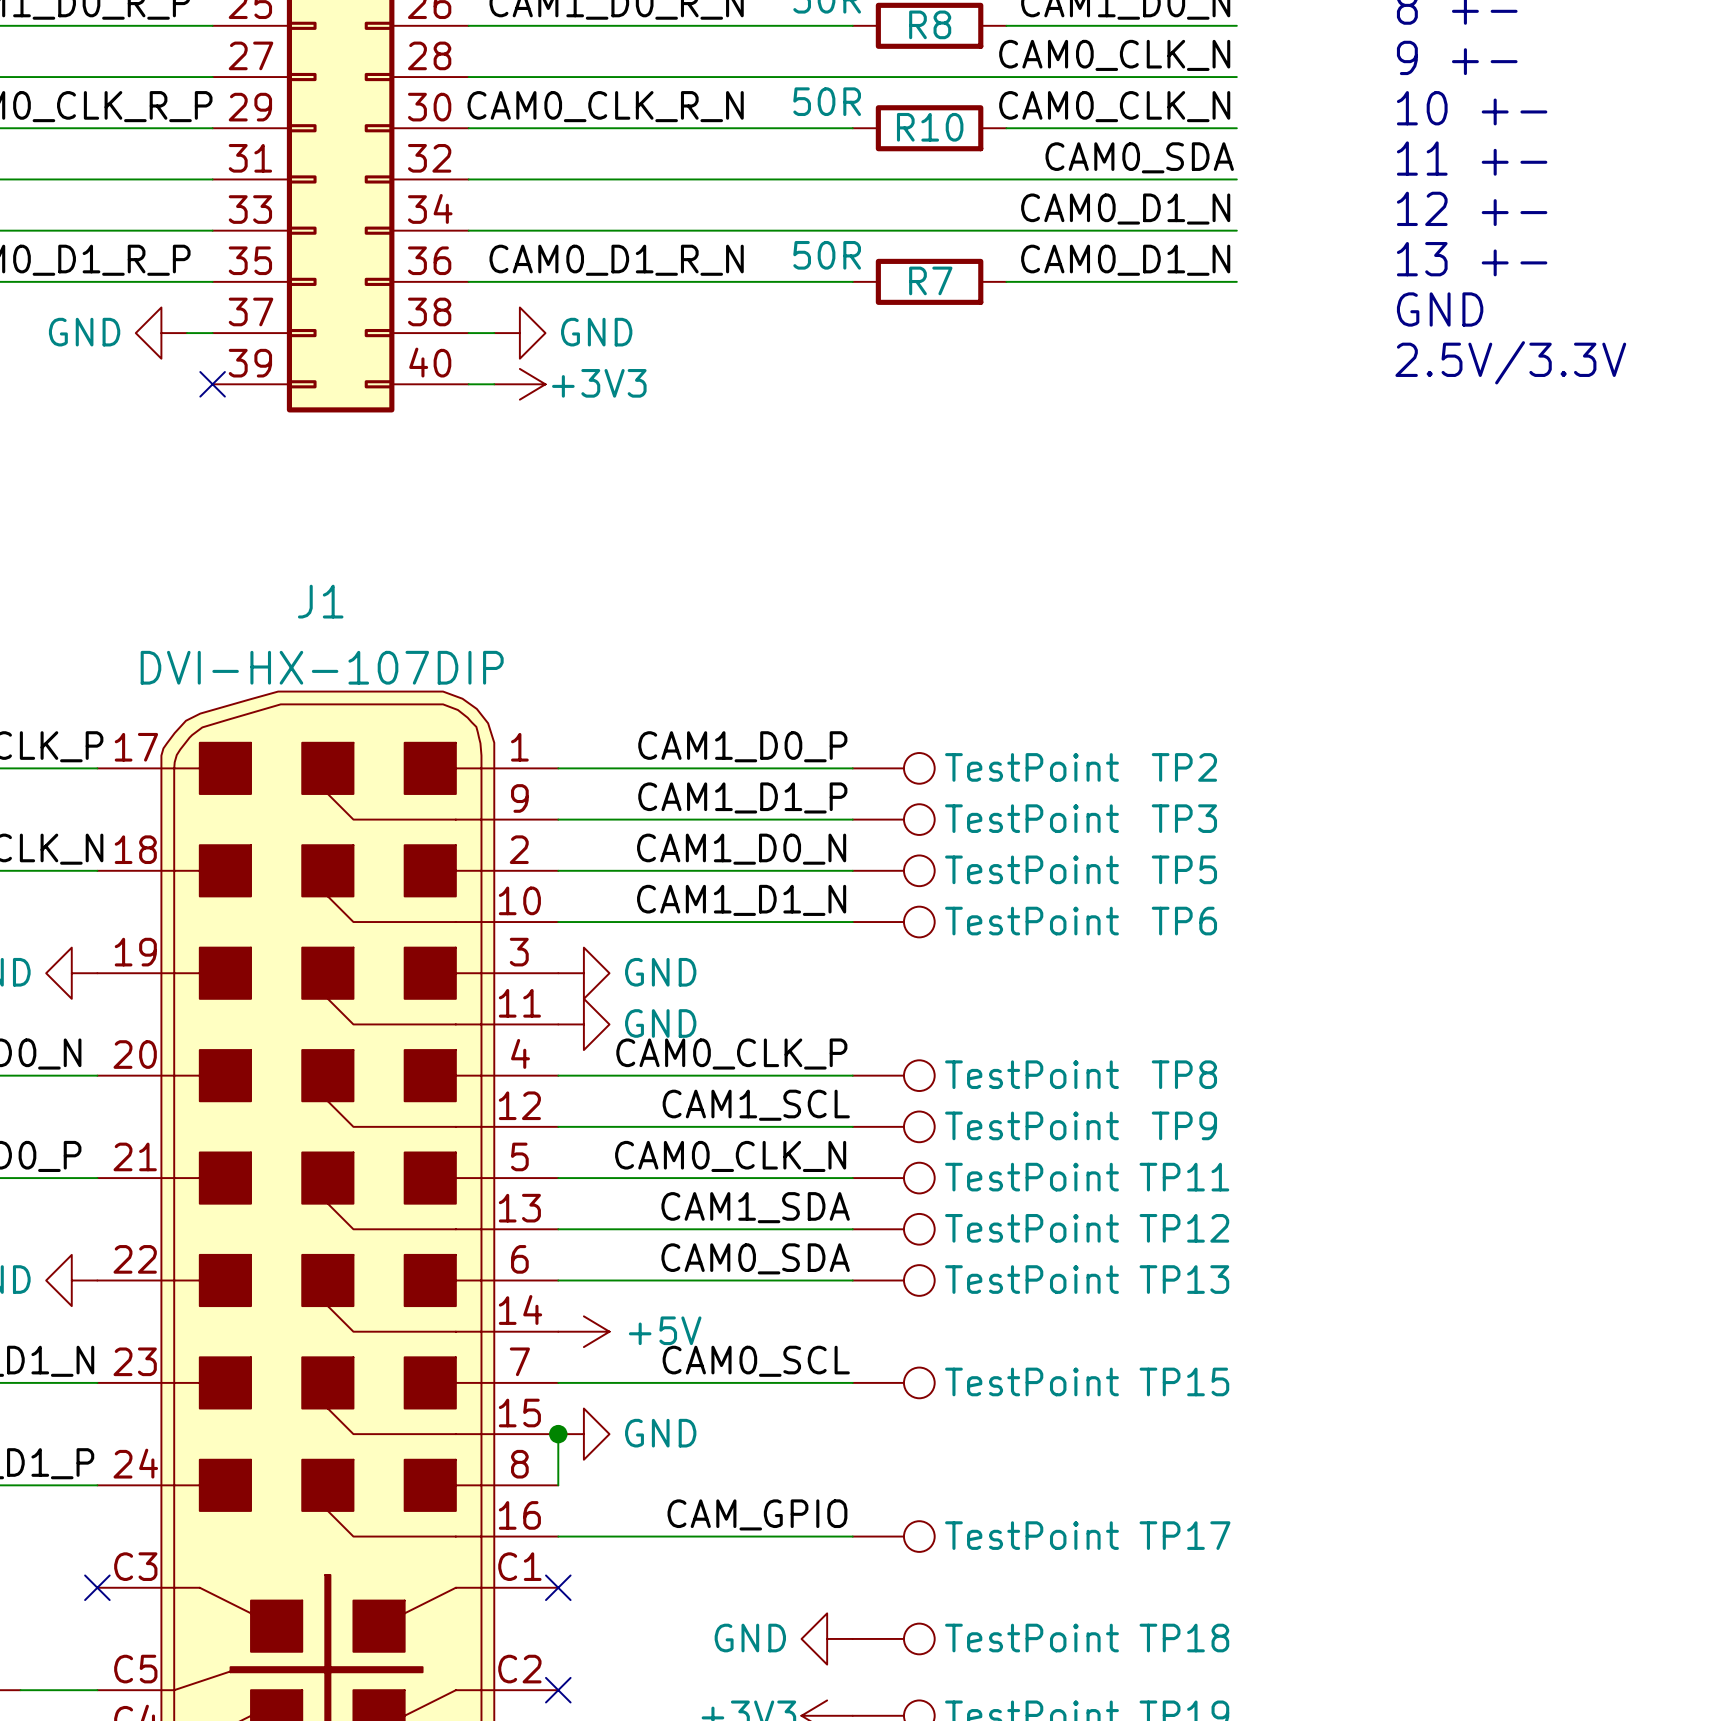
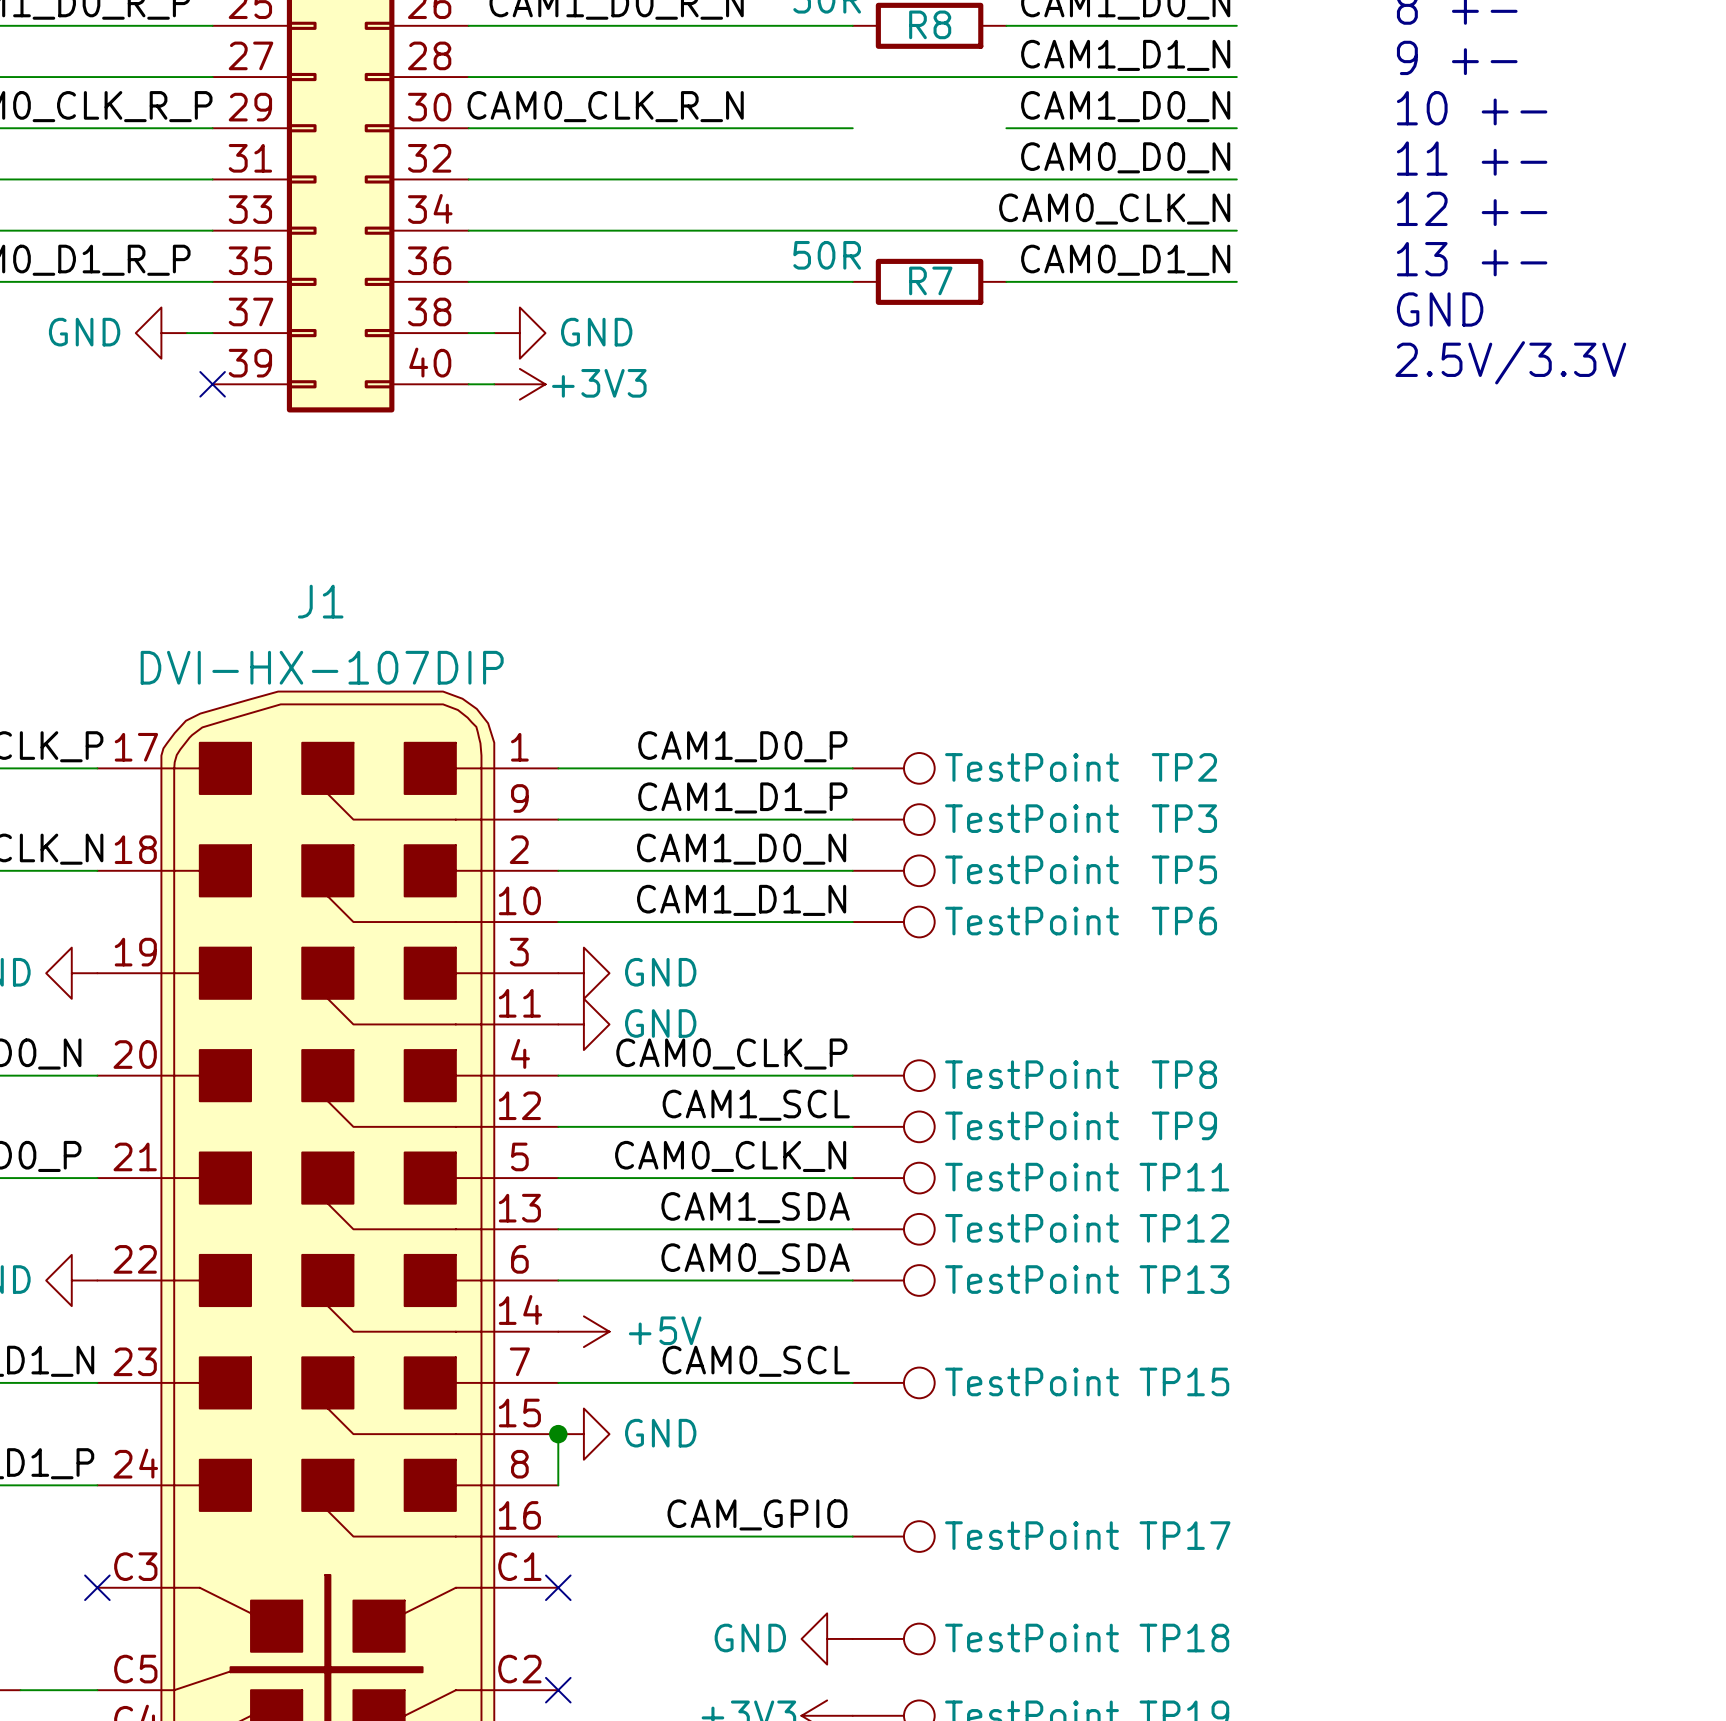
label: CAM0_CLK_N (1114, 55) -> CAM1_D1_N (1125, 55)
label: CAM0_CLK_N (1114, 106) -> CAM1_D0_N (1125, 106)
R10: 50R (929, 128) -> none
label: CAM0_SDA (1139, 157) -> CAM0_D0_N (1125, 157)
label: CAM0_D1_N (1125, 209) -> CAM0_CLK_N (1114, 209)
label: CAM0_D1_R_N (616, 260) -> none

